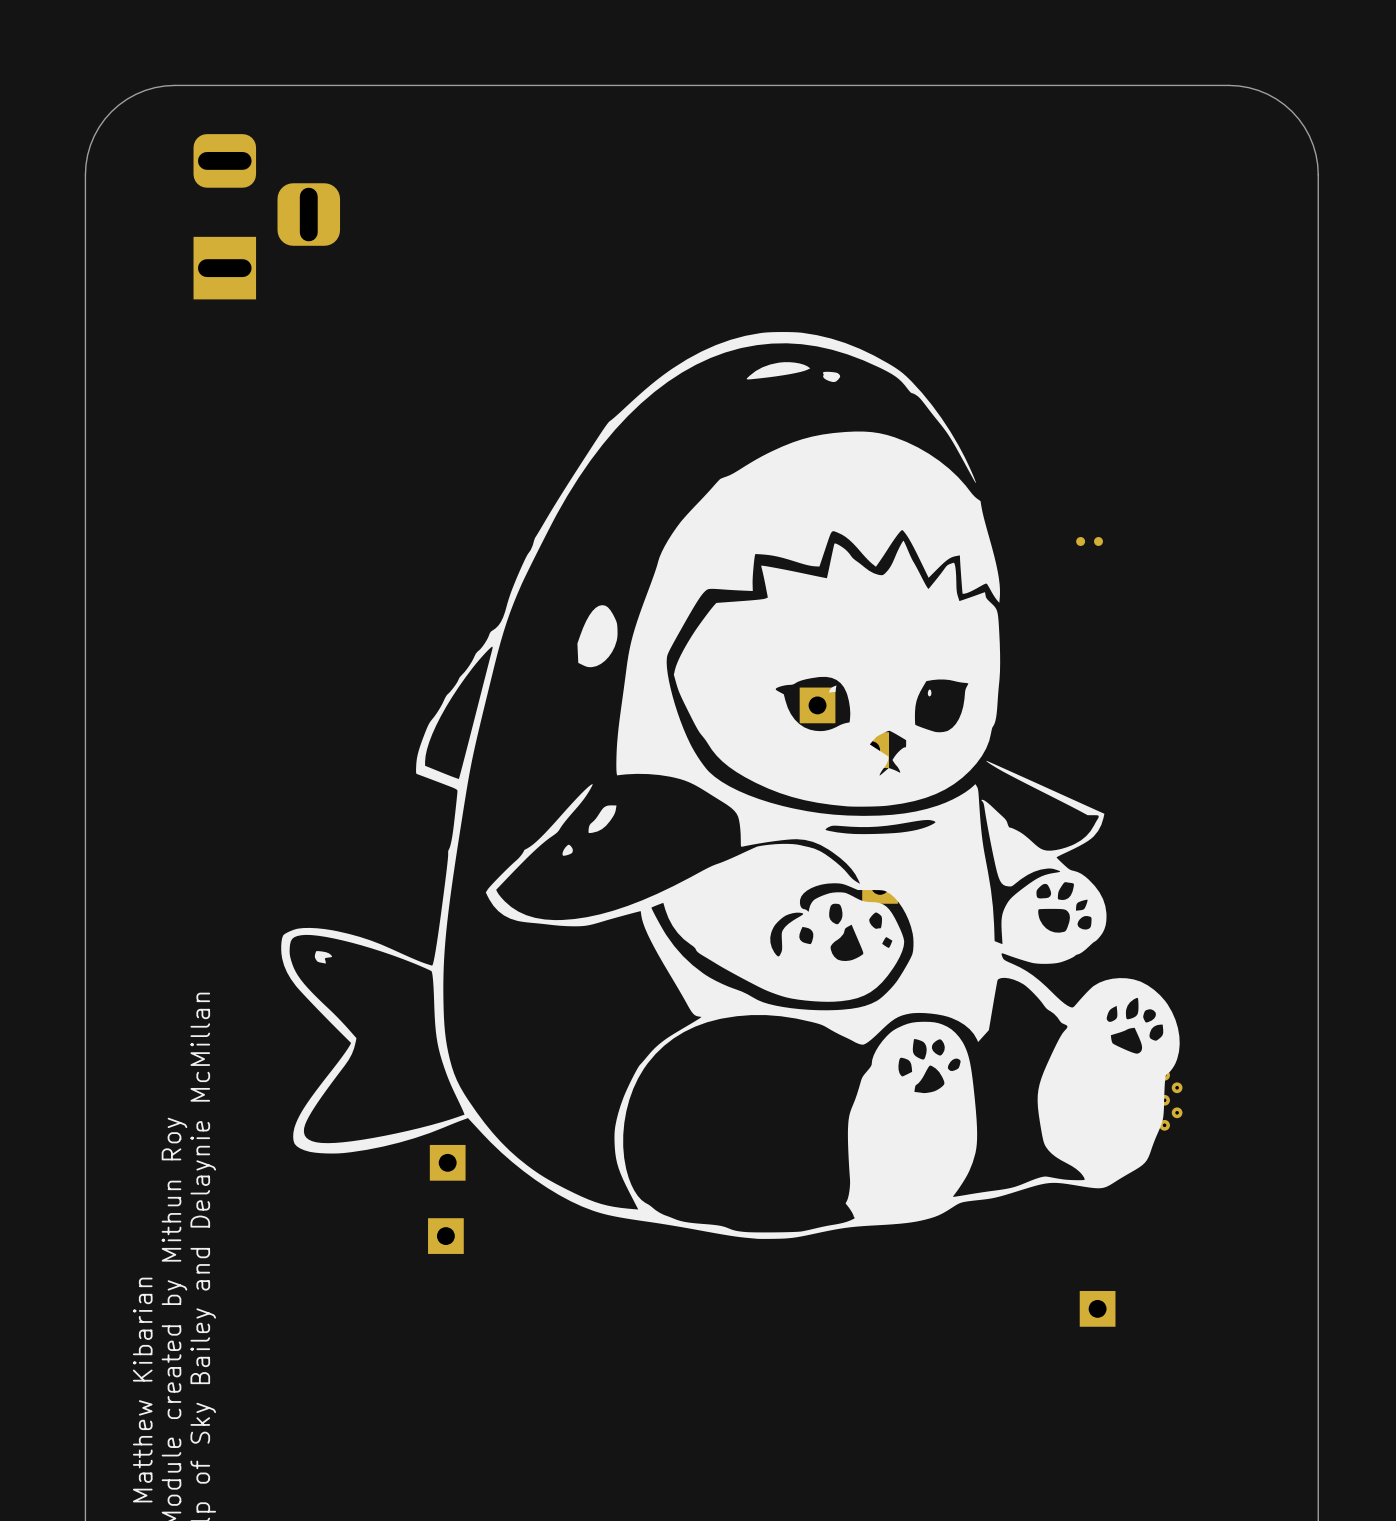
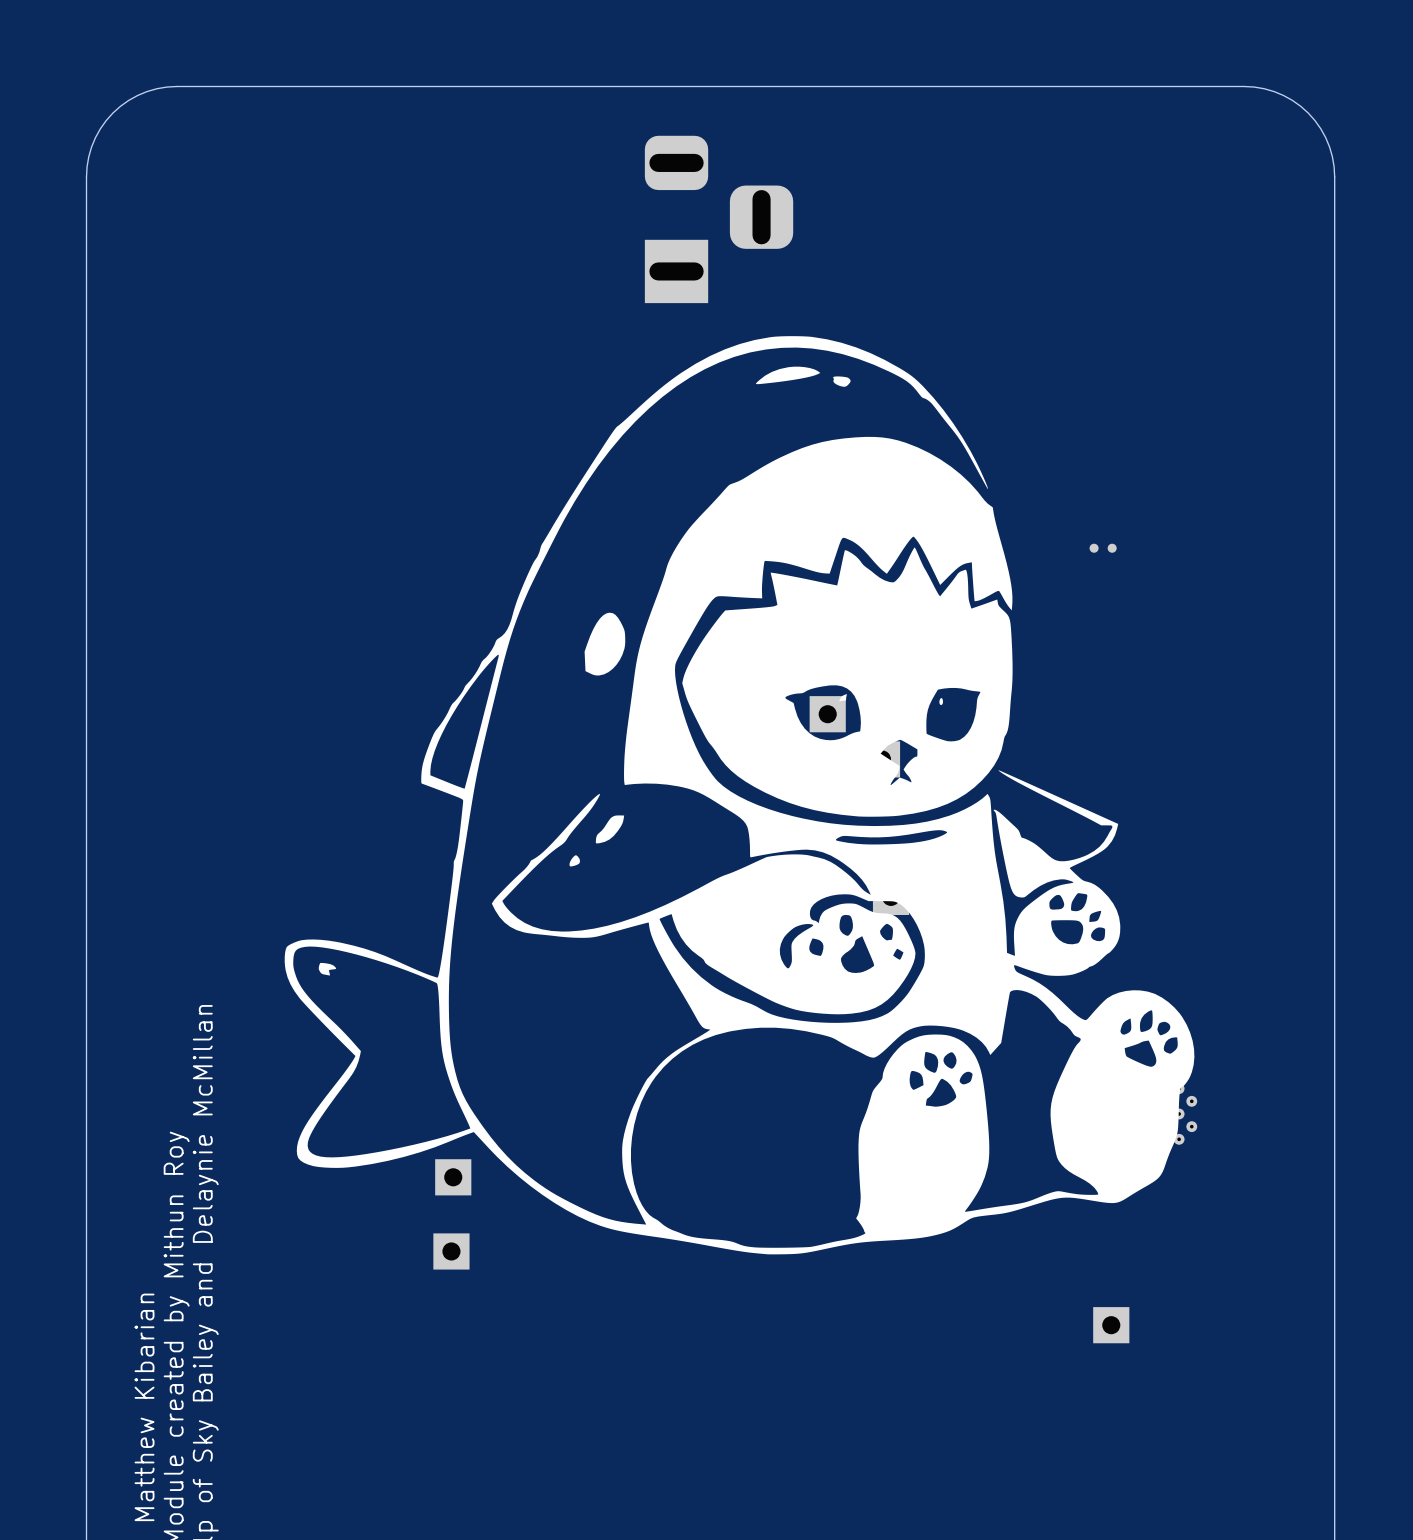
part position: (266, 216) -> (719, 219)

